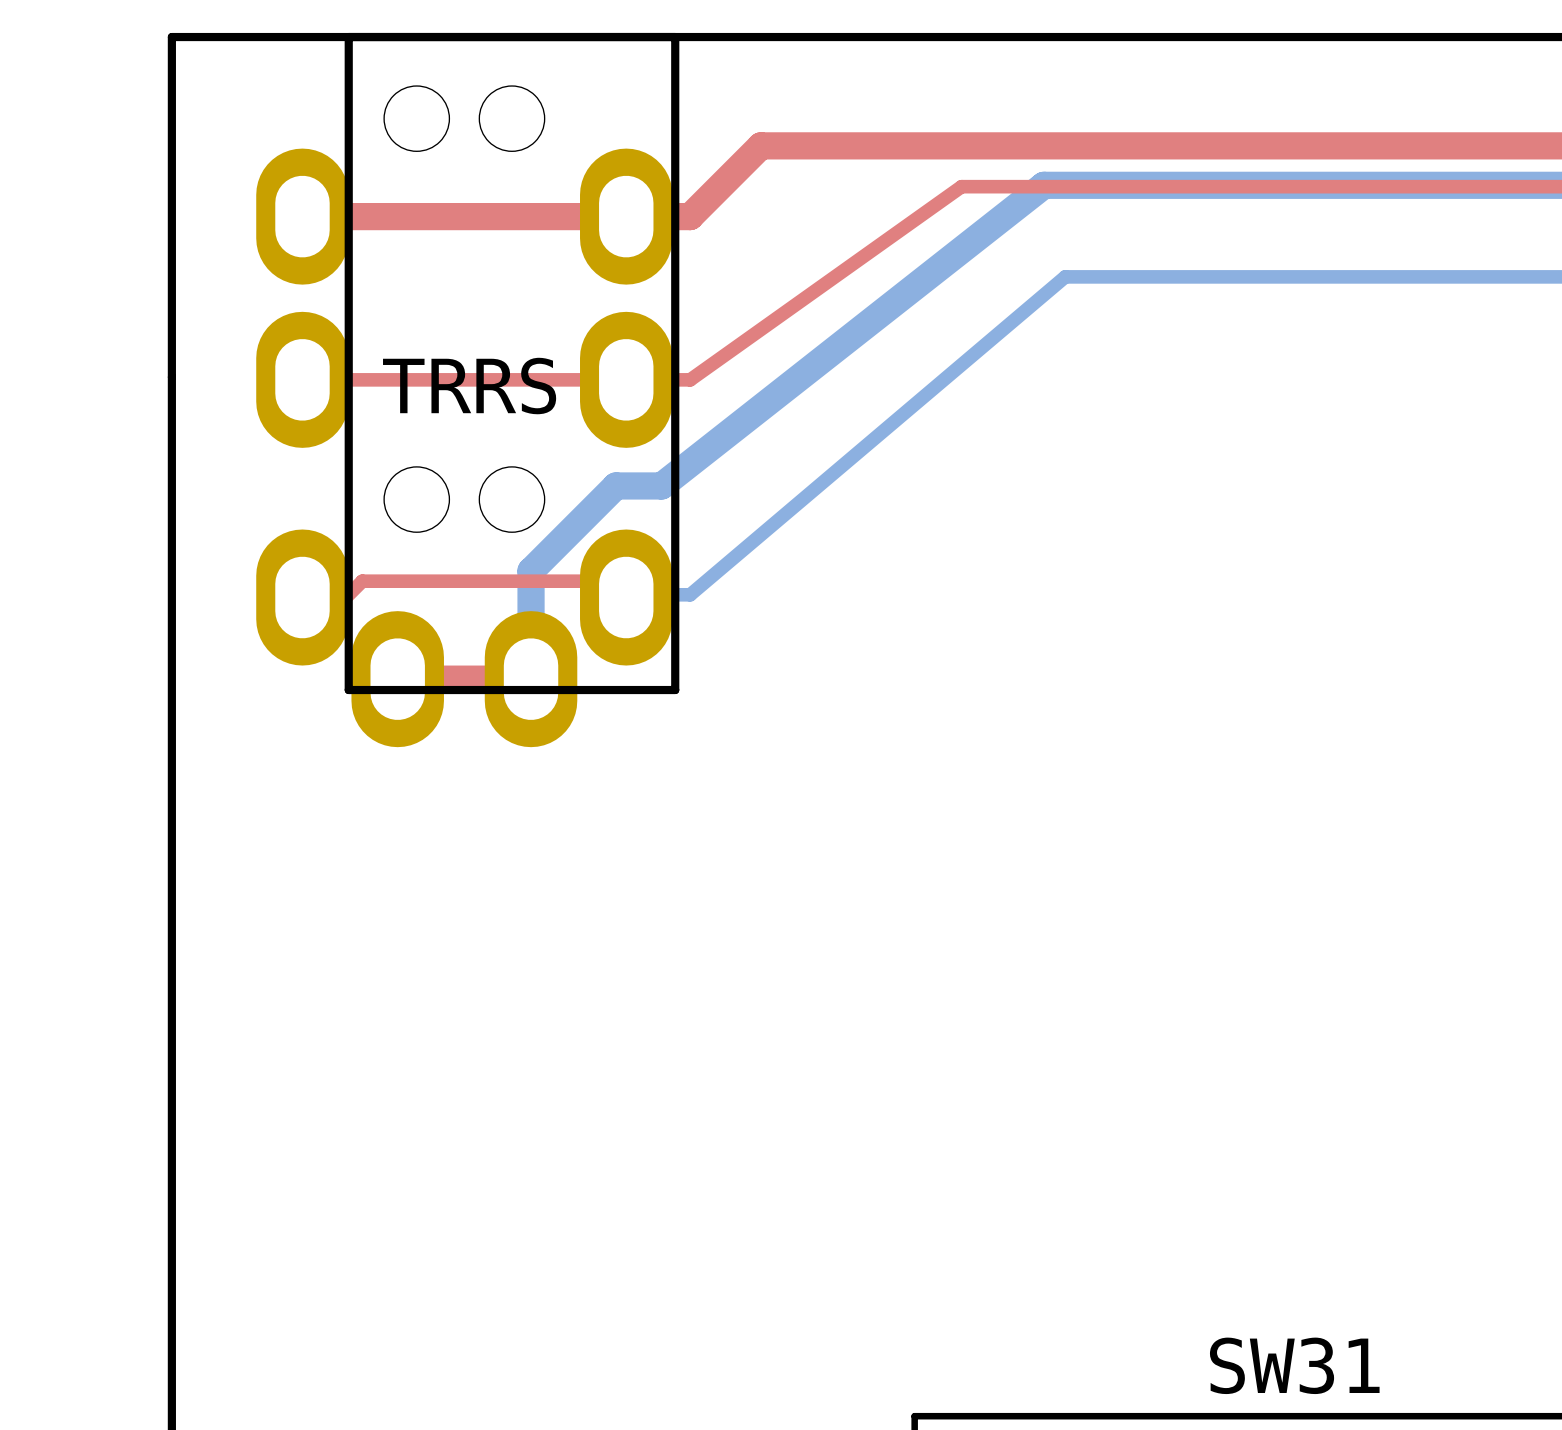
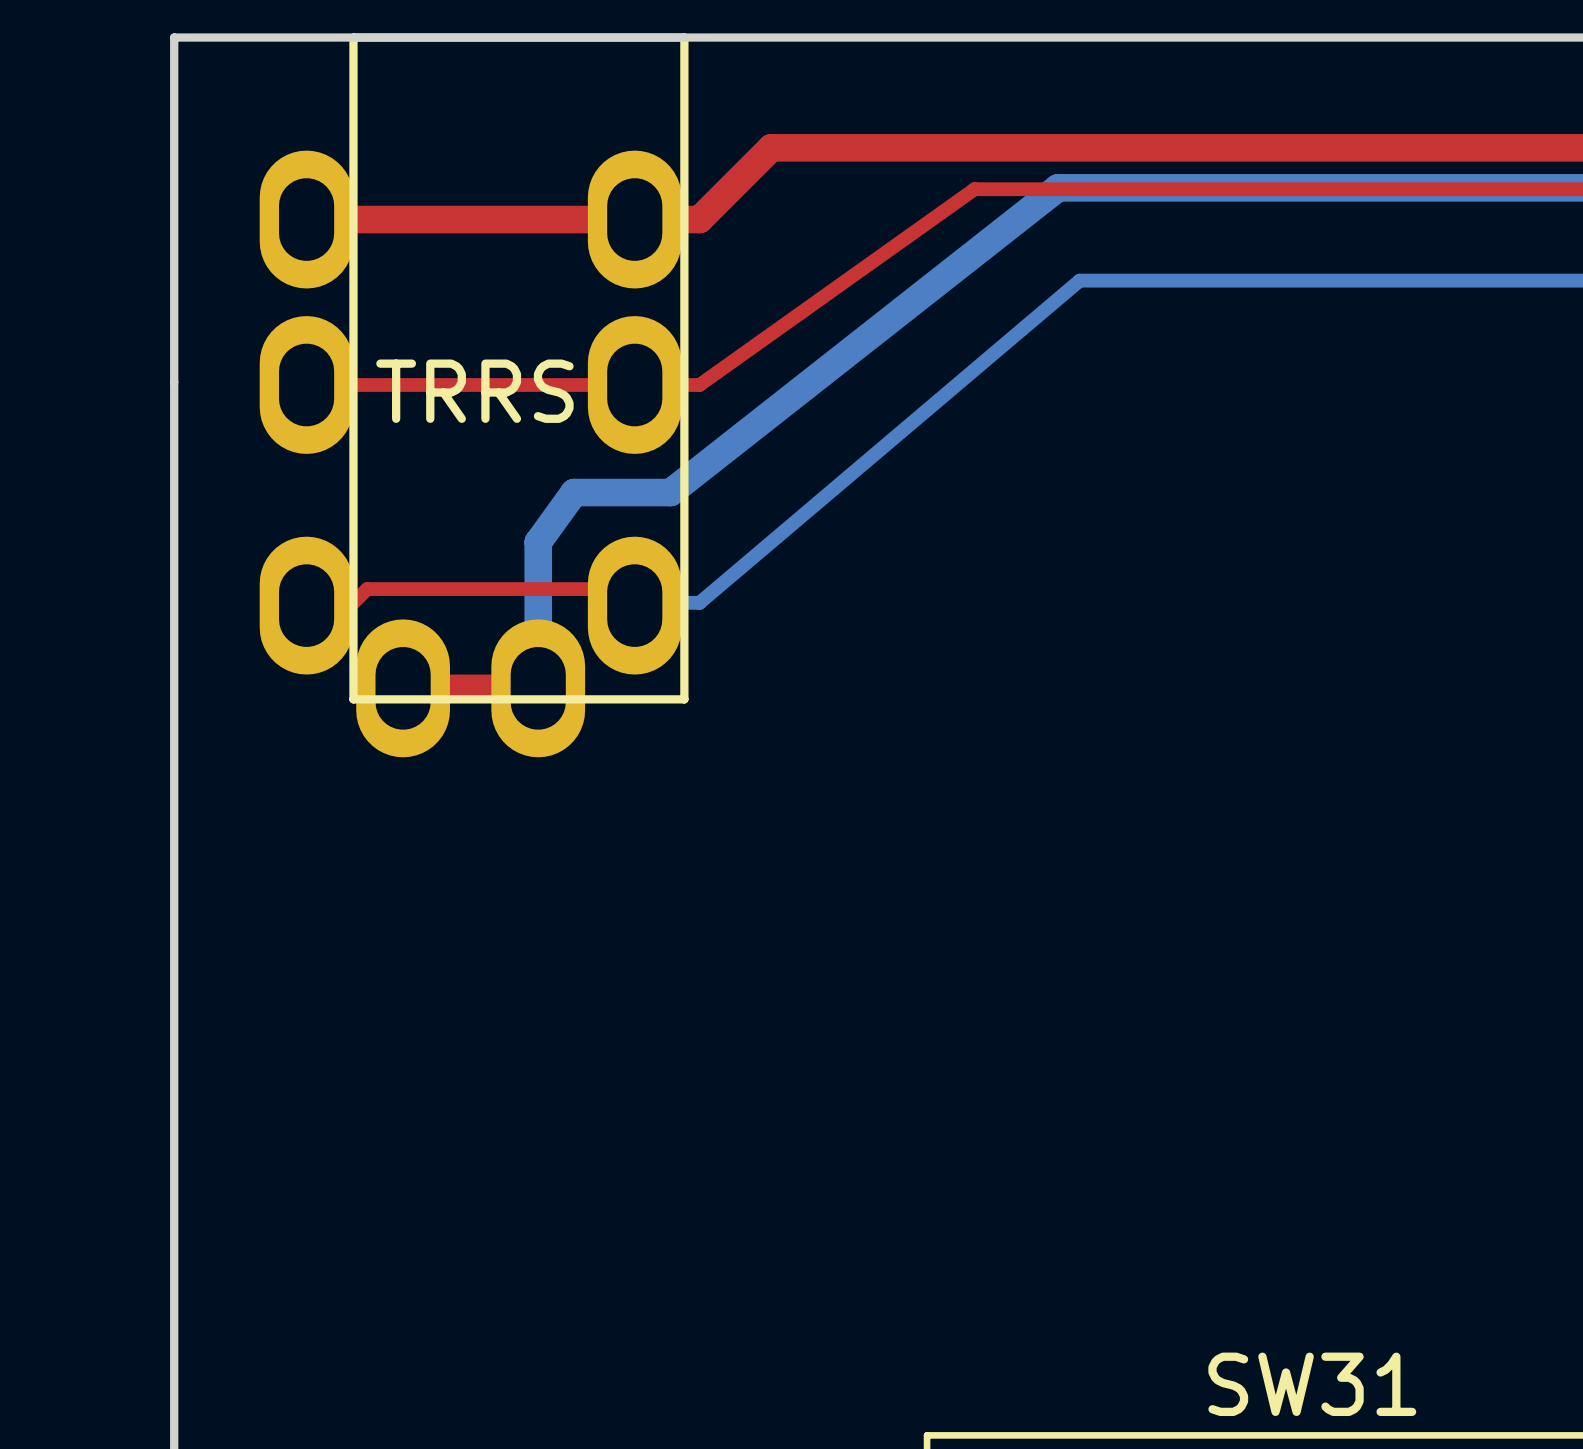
part footprint: [256, 32, 680, 748] -> [259, 33, 689, 758]
bottom track: (616, 485) (531, 570) -> (624, 492) (574, 492) (538, 542) (538, 578)

